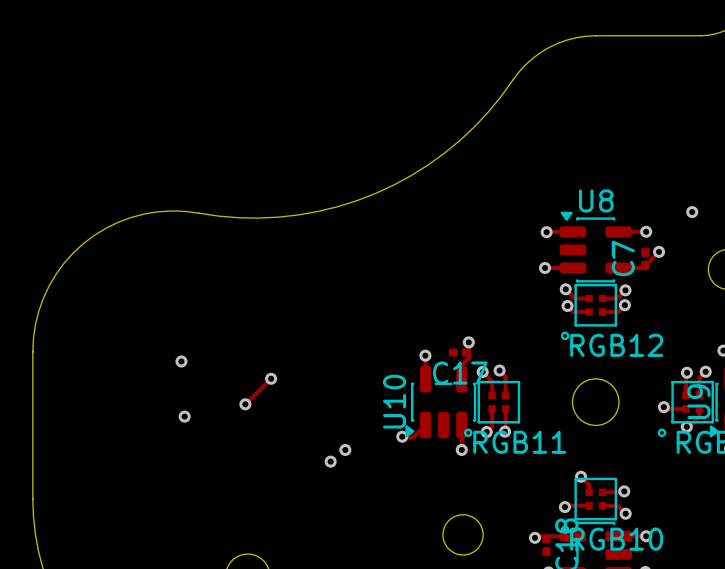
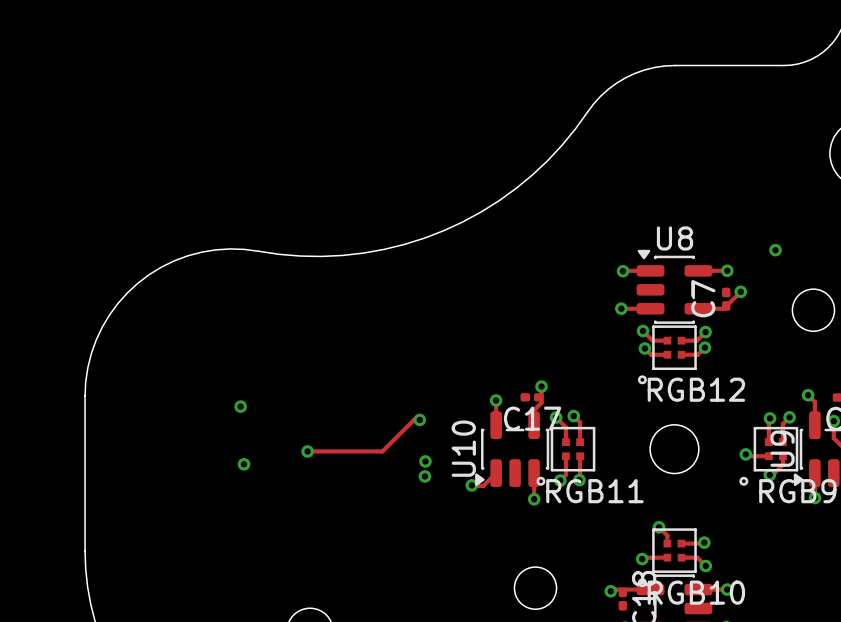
via: none -> (419, 419)
track: (271, 378) (245, 404) -> (419, 419) (414, 419) (382, 451) (307, 451)
via: (271, 378) -> none
via: none -> (425, 461)
via: none -> (424, 476)
via: (345, 449) -> none
via: (330, 461) -> none

